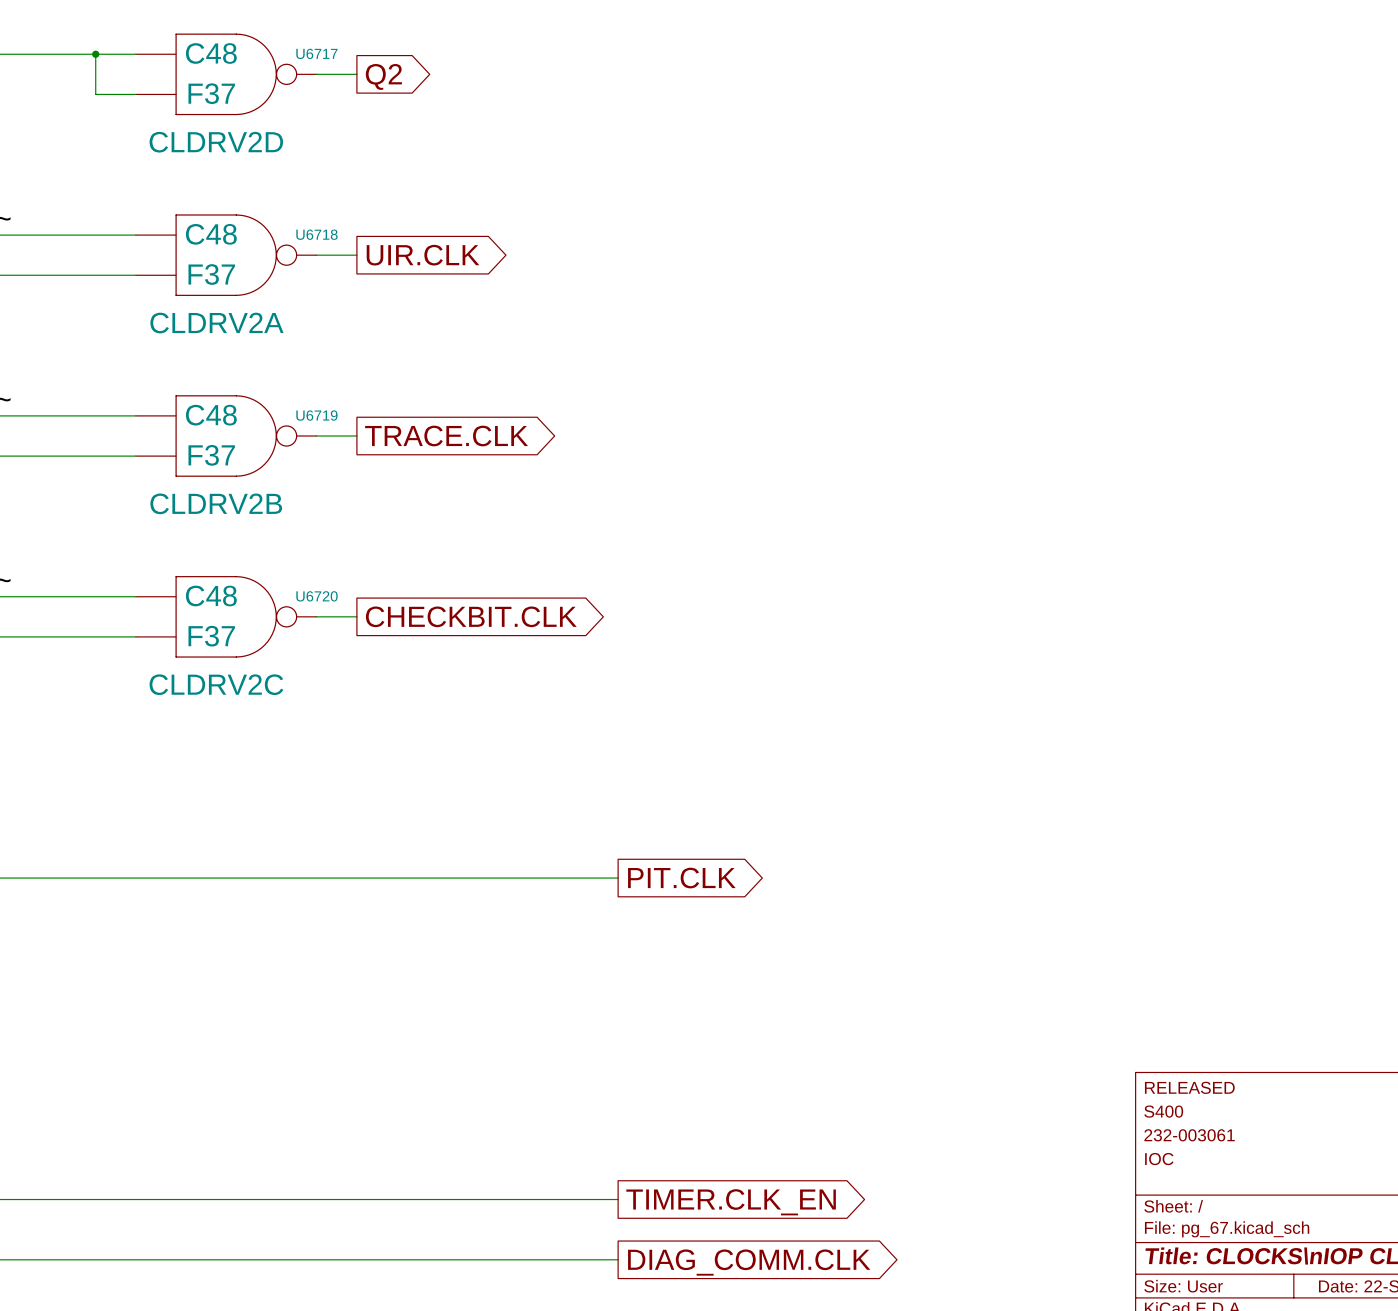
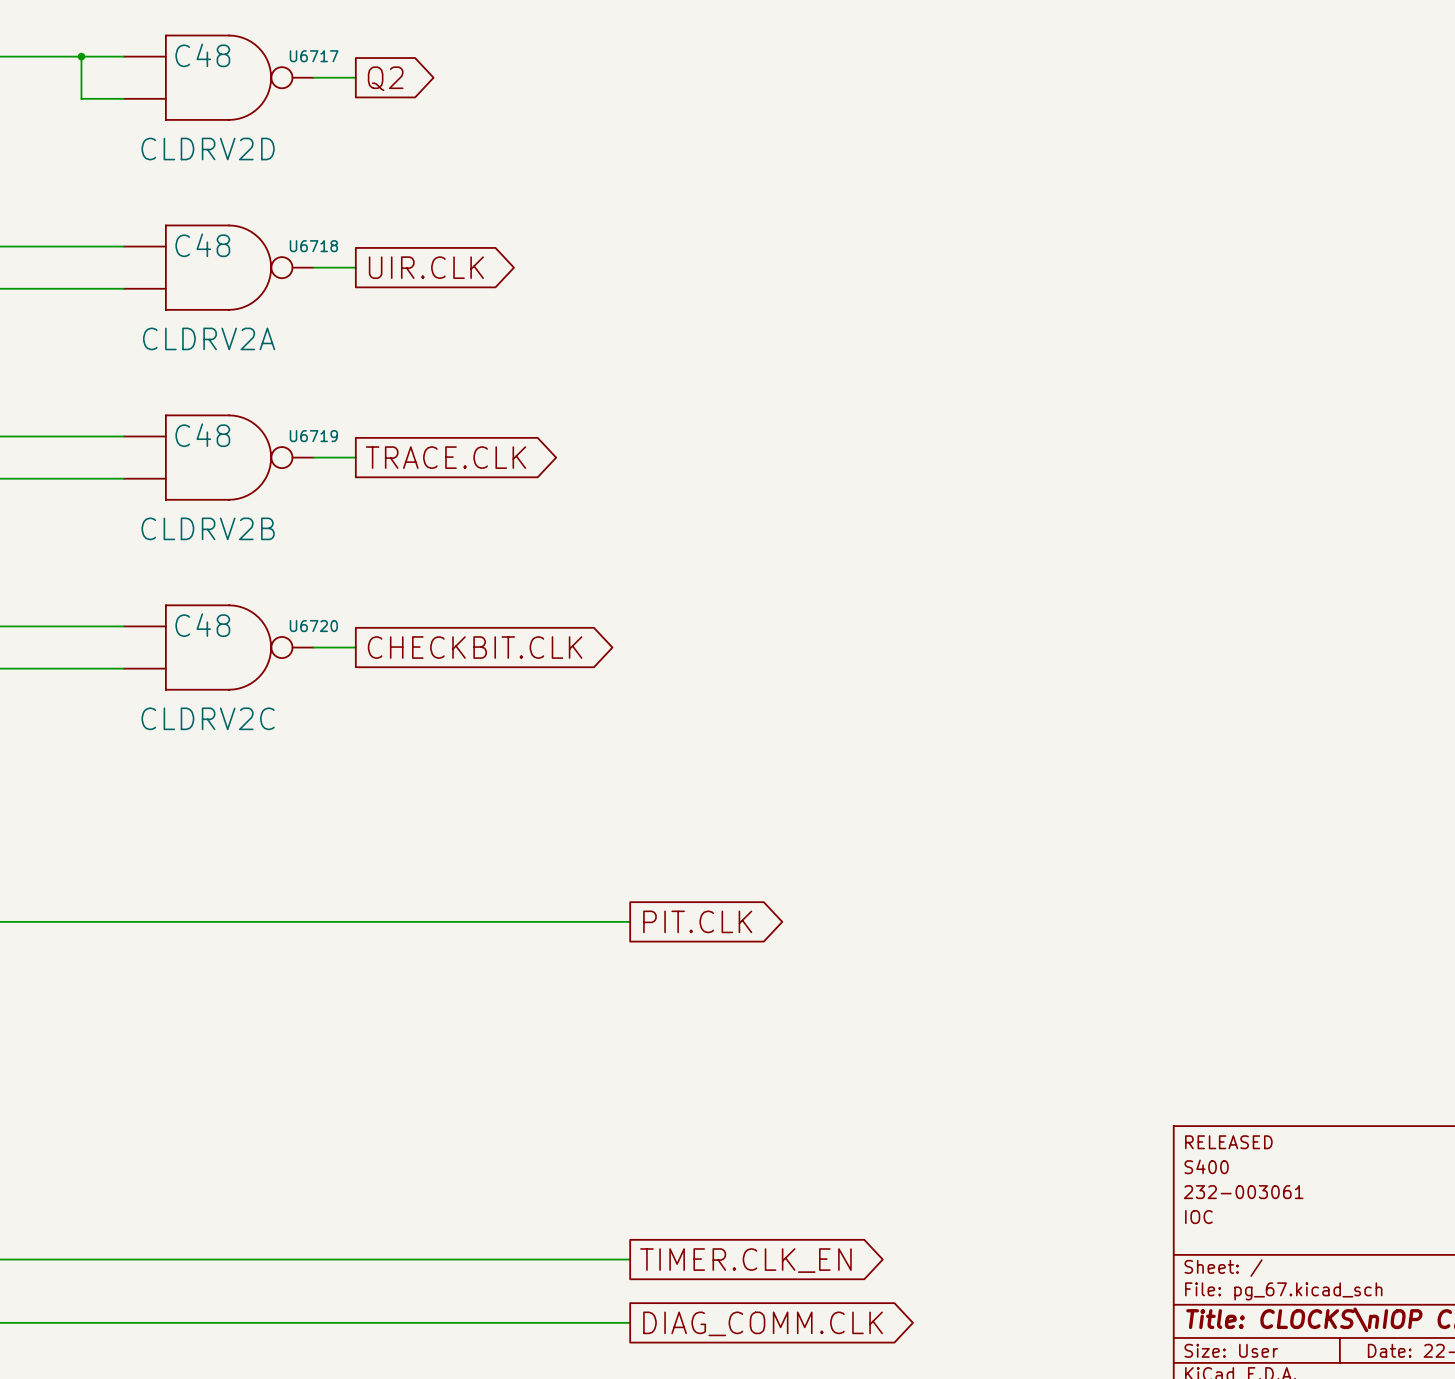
U6717 value: F37 (211, 93) -> none
U6718 value: F37 (211, 274) -> none
U6719 value: F37 (211, 455) -> none
U6720 value: F37 (211, 636) -> none

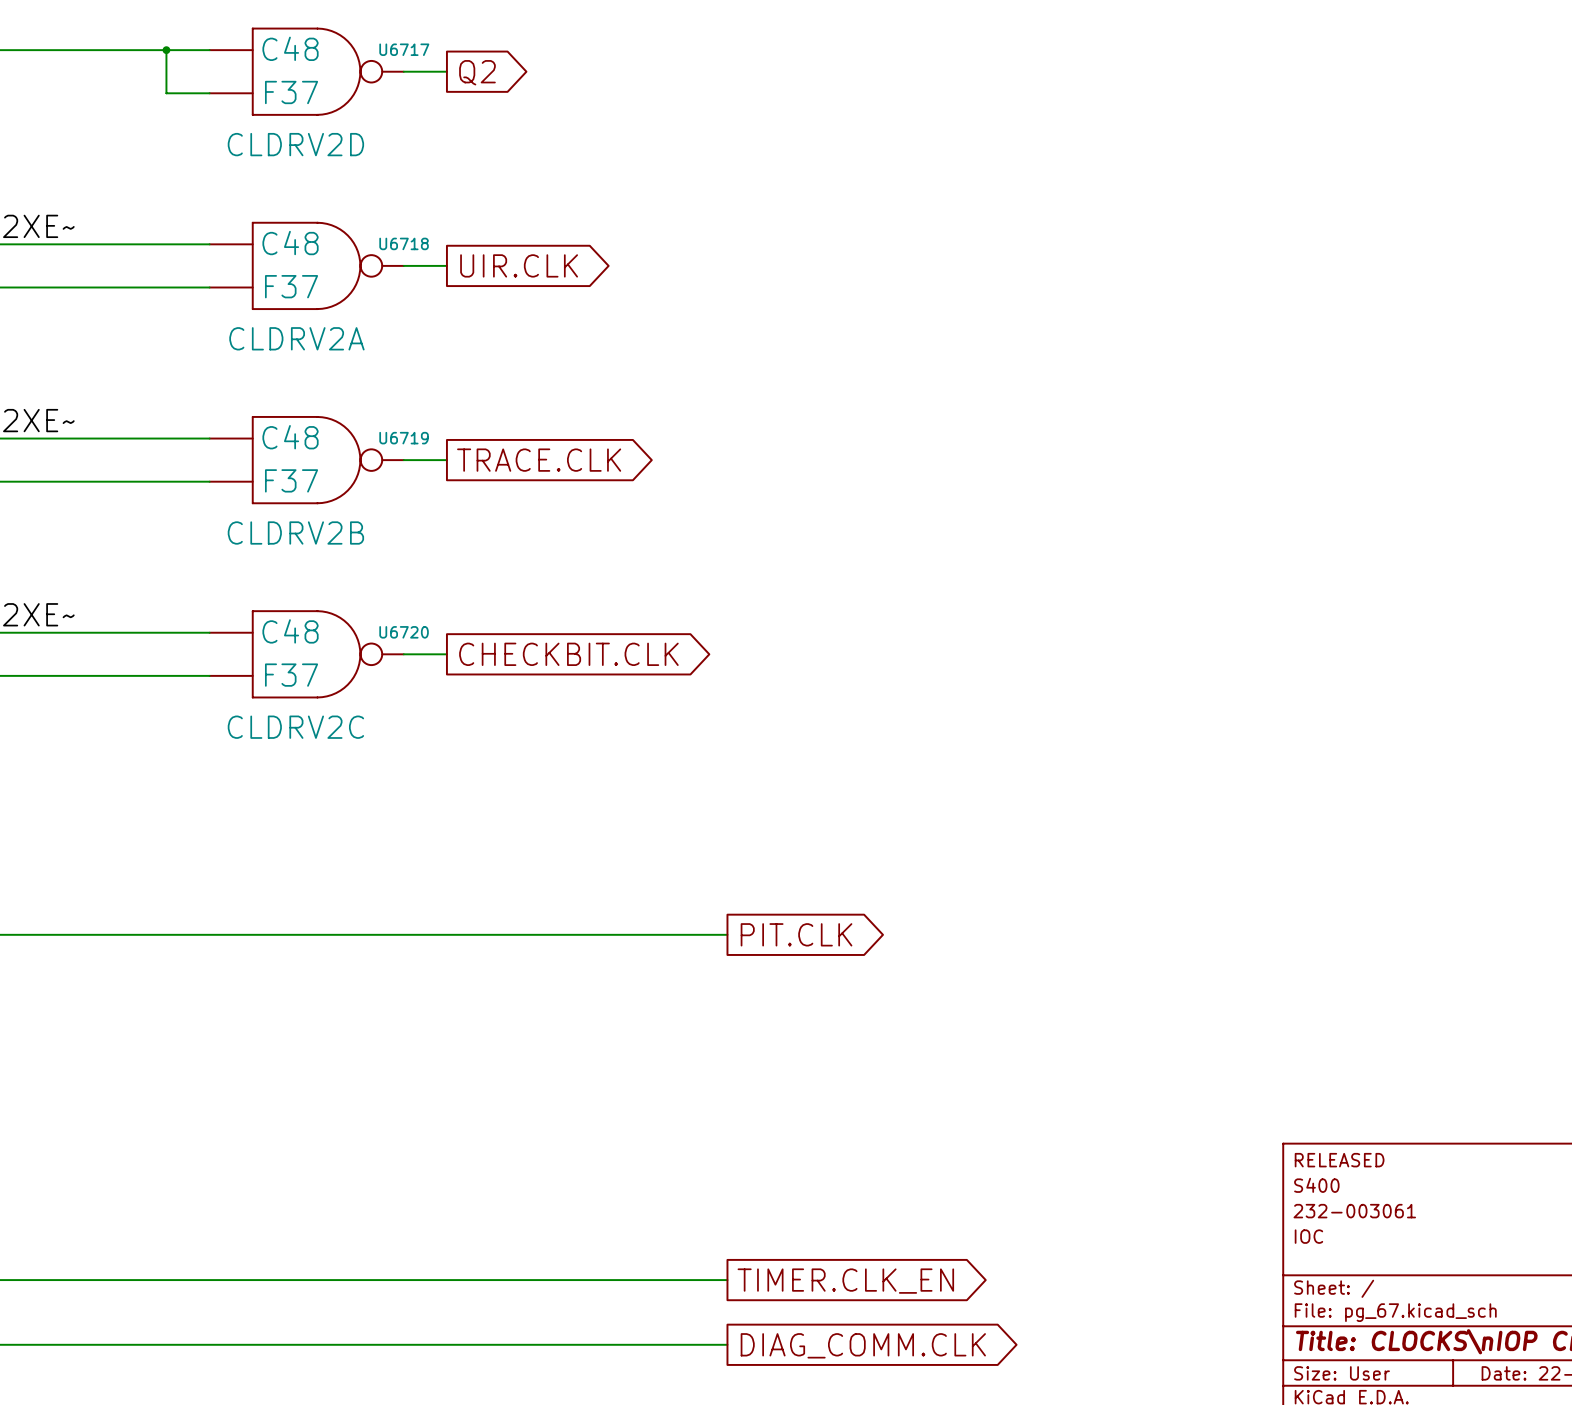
U6717 value: none -> F37 (291, 92)
U6718 value: none -> F37 (291, 286)
U6719 value: none -> F37 (291, 480)
U6720 value: none -> F37 (291, 675)

